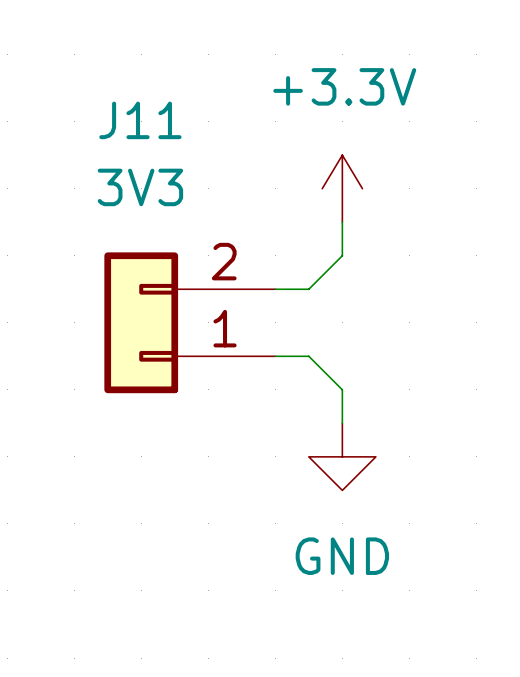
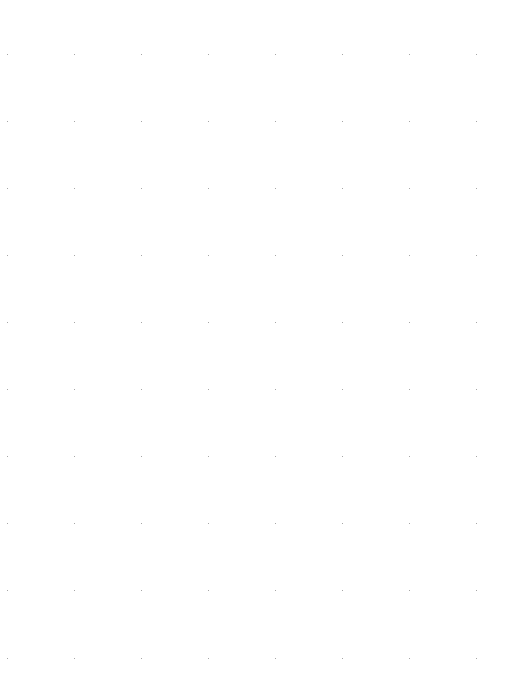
power symbol: +3.3V (342, 188) -> none
wire: (342, 222) (342, 255) (308, 289) (275, 289) -> none
J11: 3V3 (189, 322) -> none
wire: (275, 356) (308, 356) (342, 389) (342, 423) -> none
power symbol: GND (342, 456) -> none

